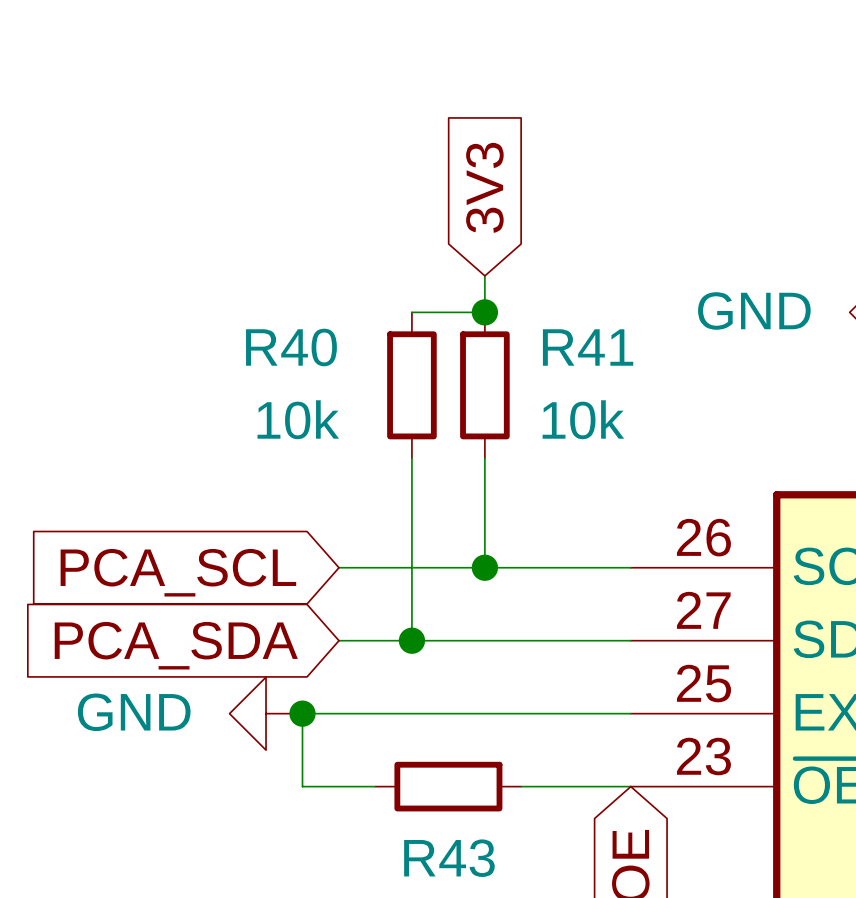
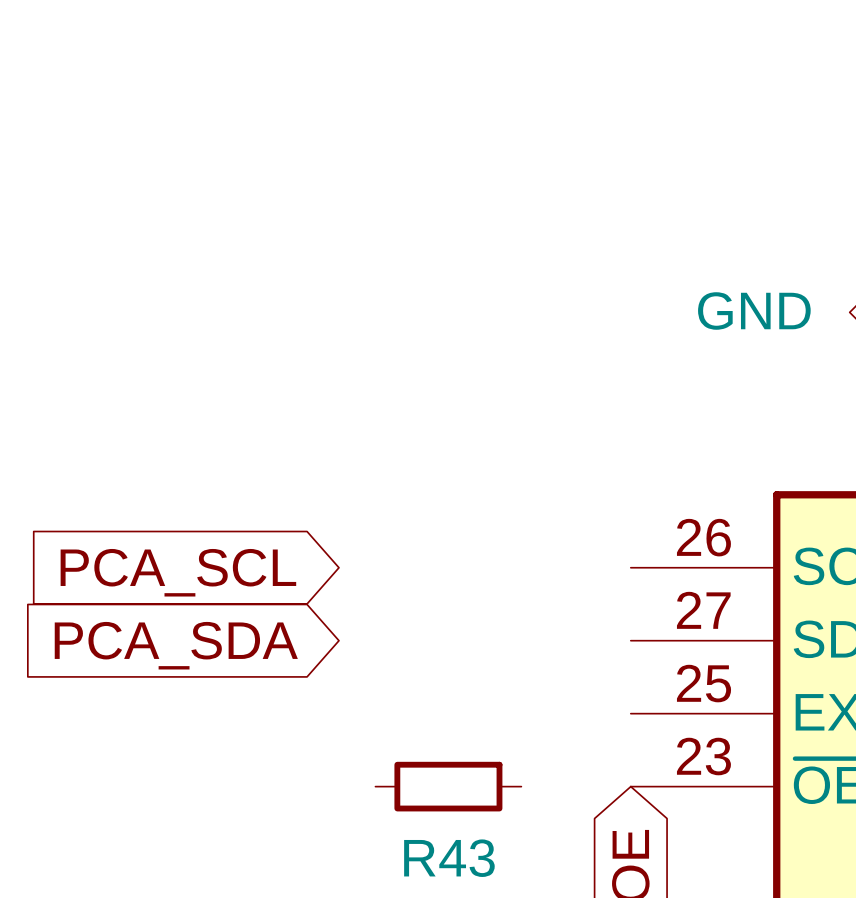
global label: 3V3 (484, 187) -> none
wire: (484, 275) (484, 312) (411, 312) -> none
junction: (484, 312) -> none
R40: 10k (411, 385) -> none
R41: 10k (484, 385) -> none
wire: (411, 458) (411, 640) -> none
wire: (484, 458) (484, 567) -> none
wire: (338, 567) (630, 567) -> none
junction: (484, 567) -> none
wire: (338, 640) (630, 640) -> none
junction: (411, 640) -> none
power symbol: GND (266, 713) -> none
junction: (302, 713) -> none
wire: (630, 713) (302, 713) (302, 786) (375, 786) -> none
wire: (521, 786) (630, 786) -> none

